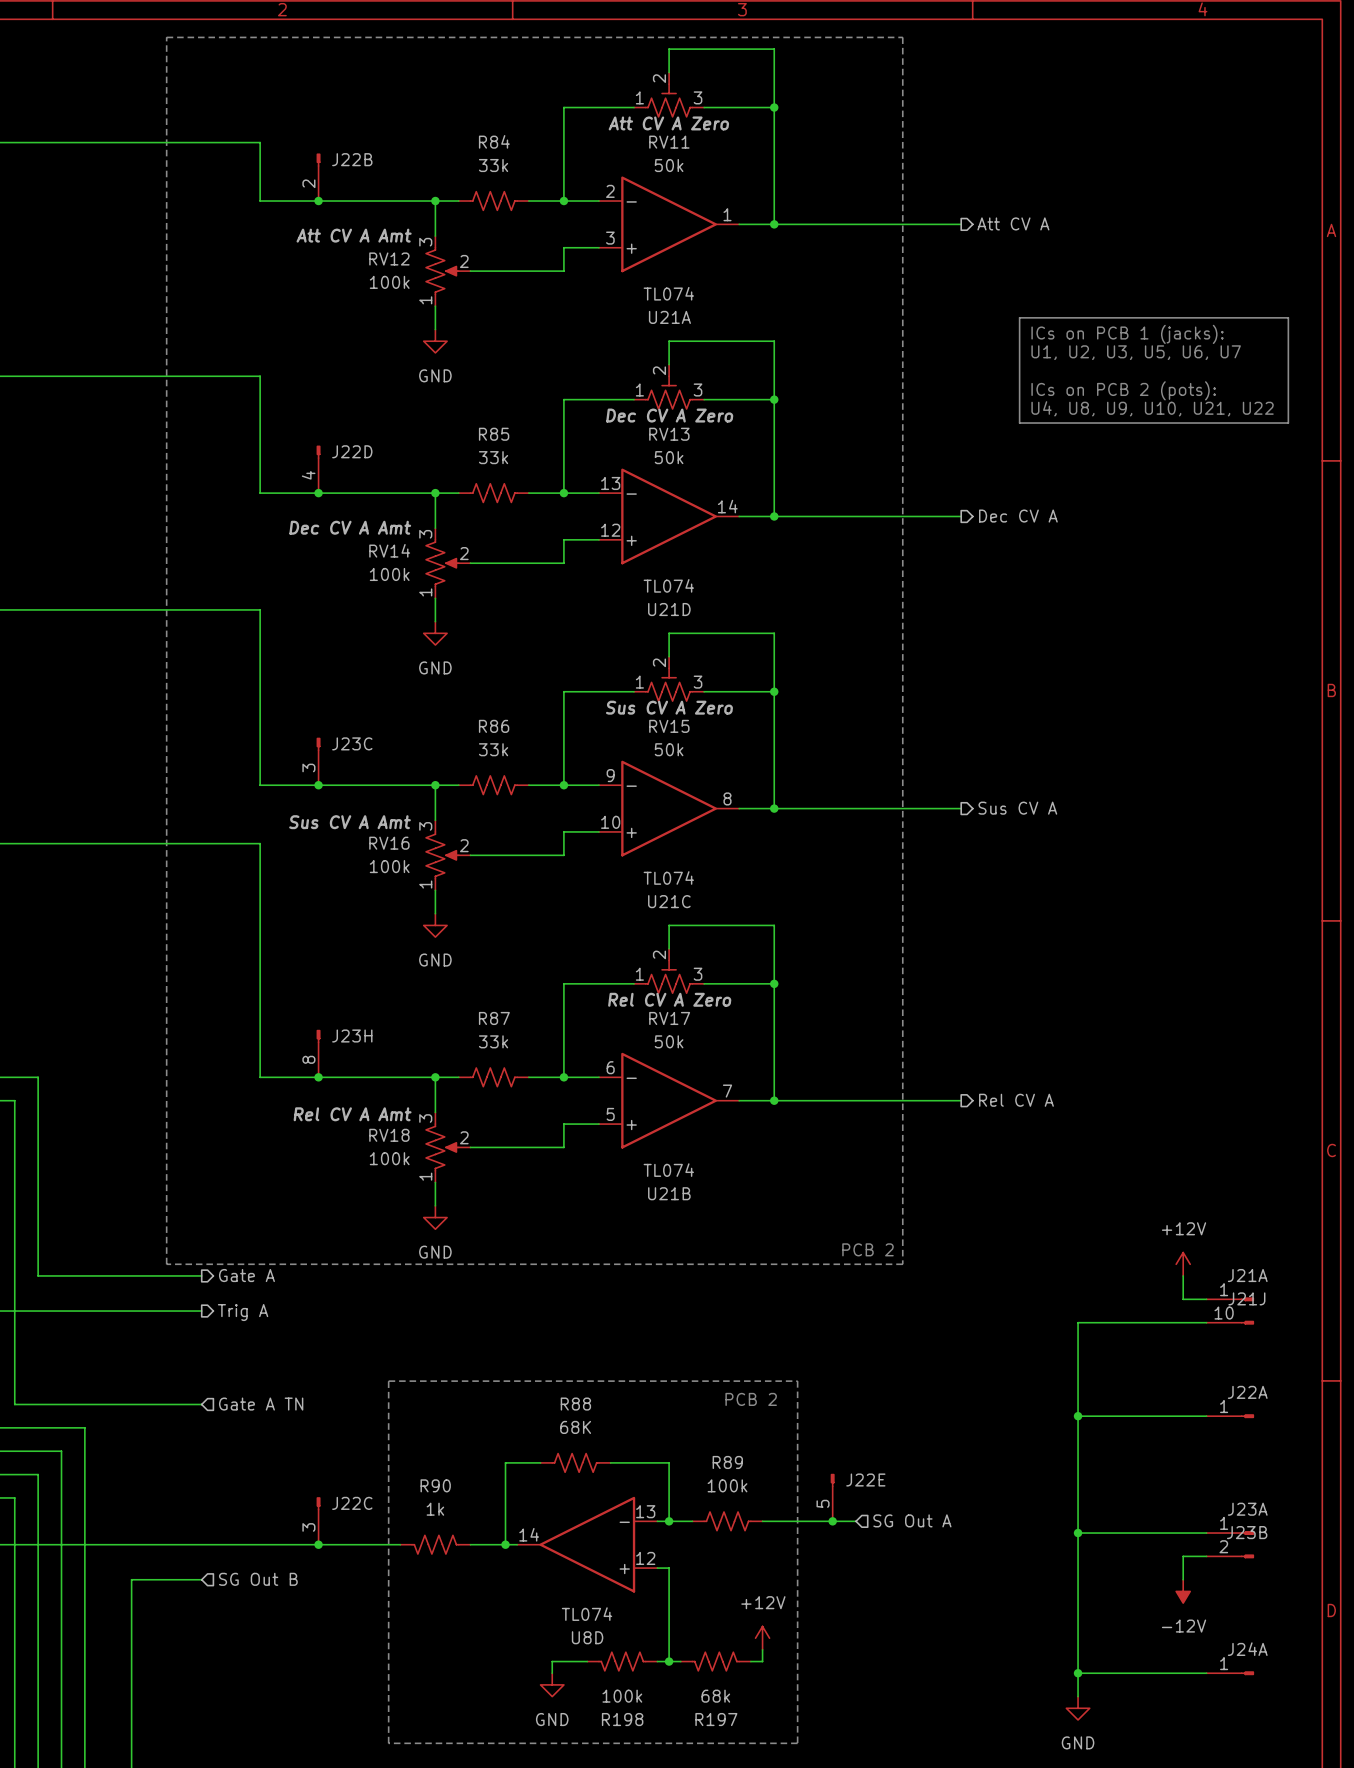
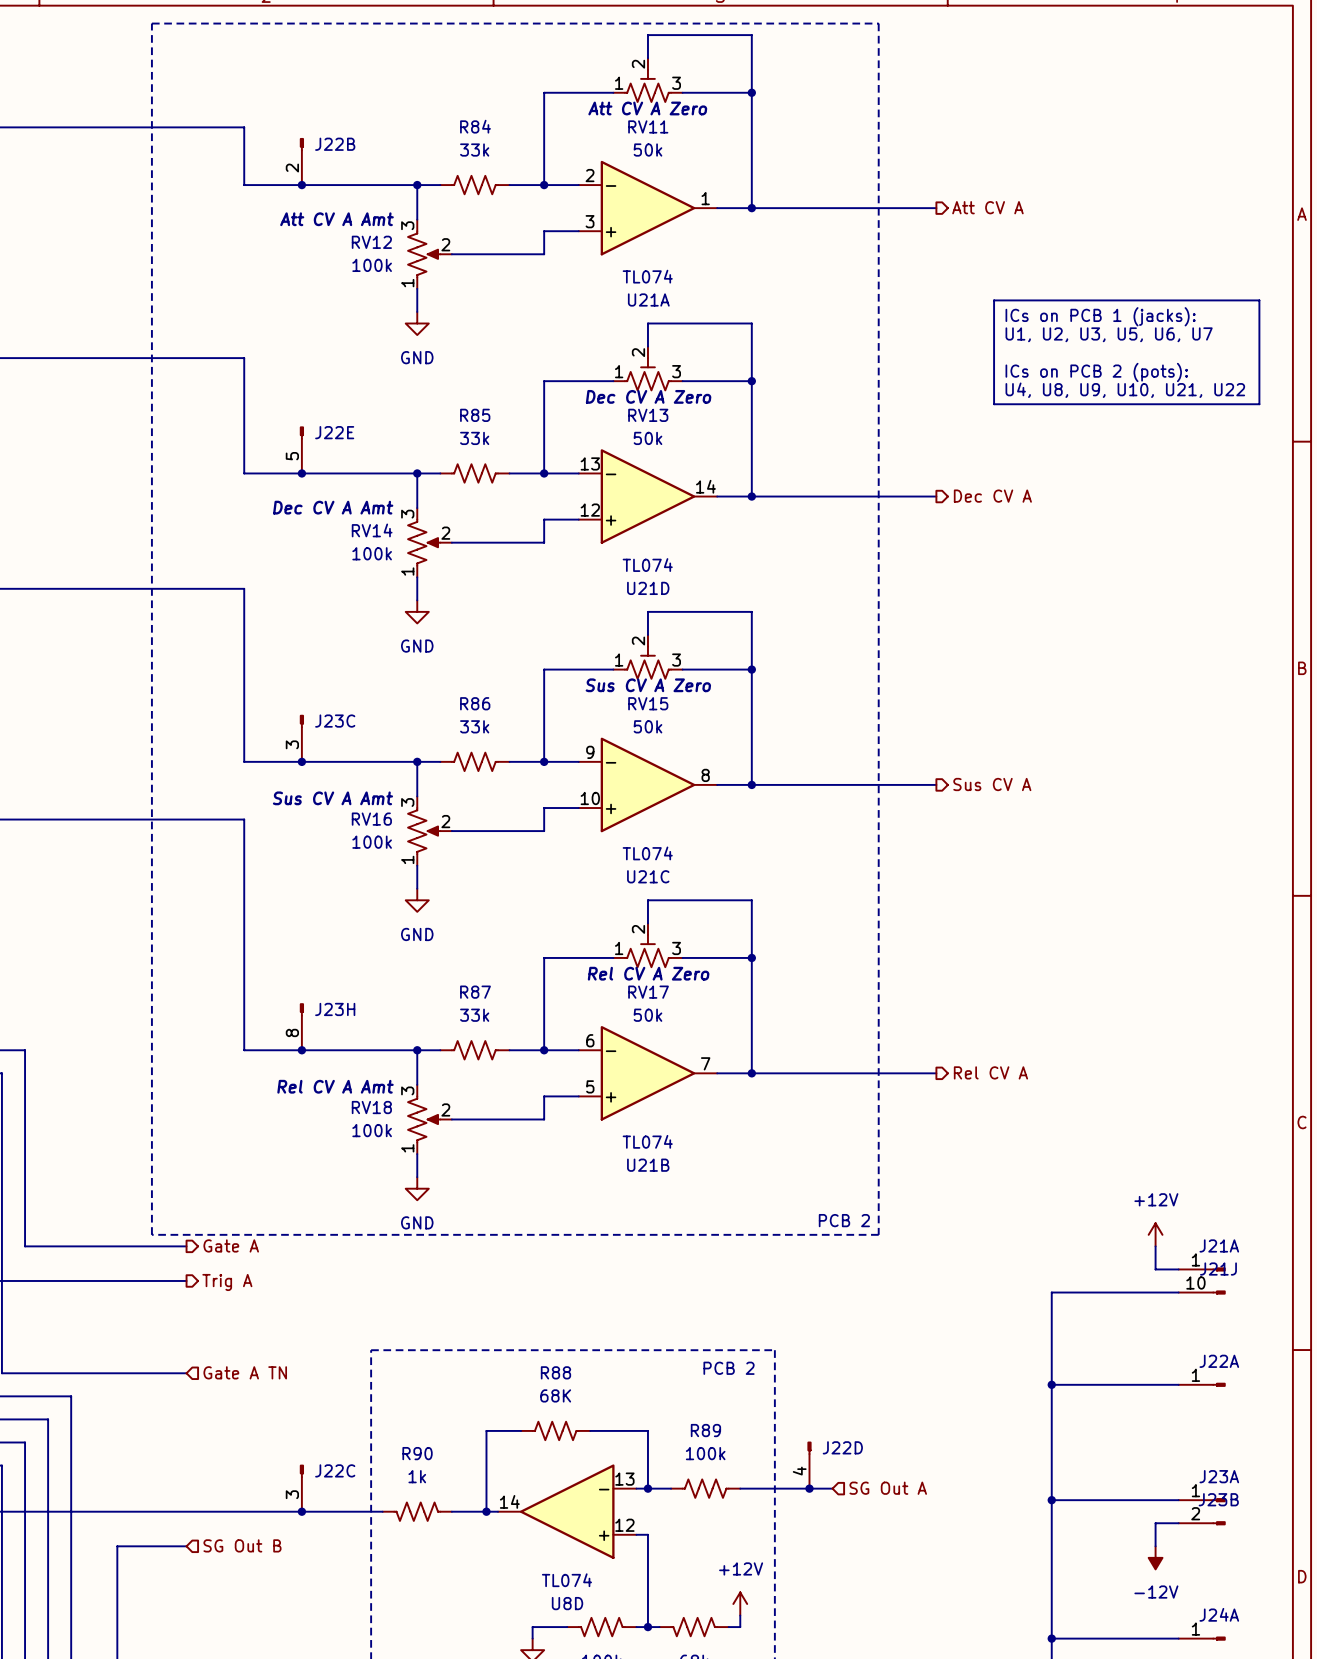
J22D position: (318, 469) -> (809, 1465)
J22E position: (832, 1497) -> (301, 450)

